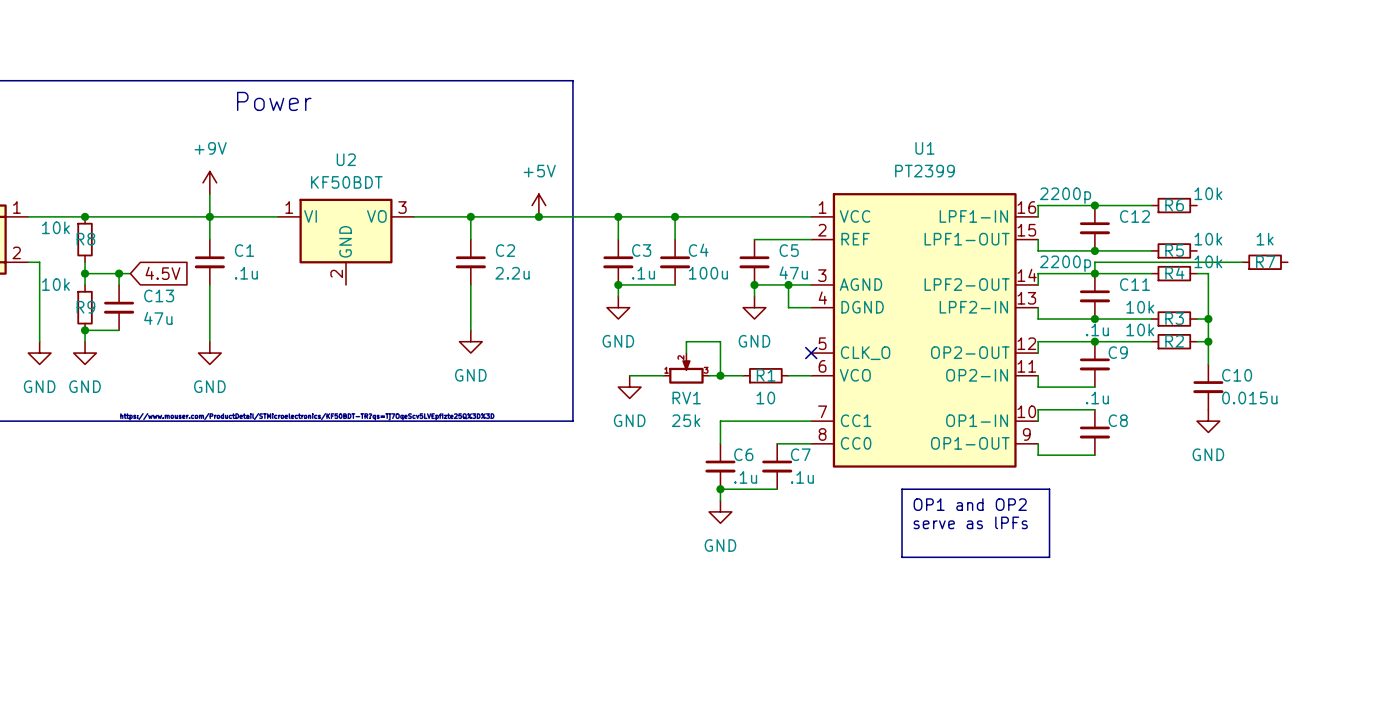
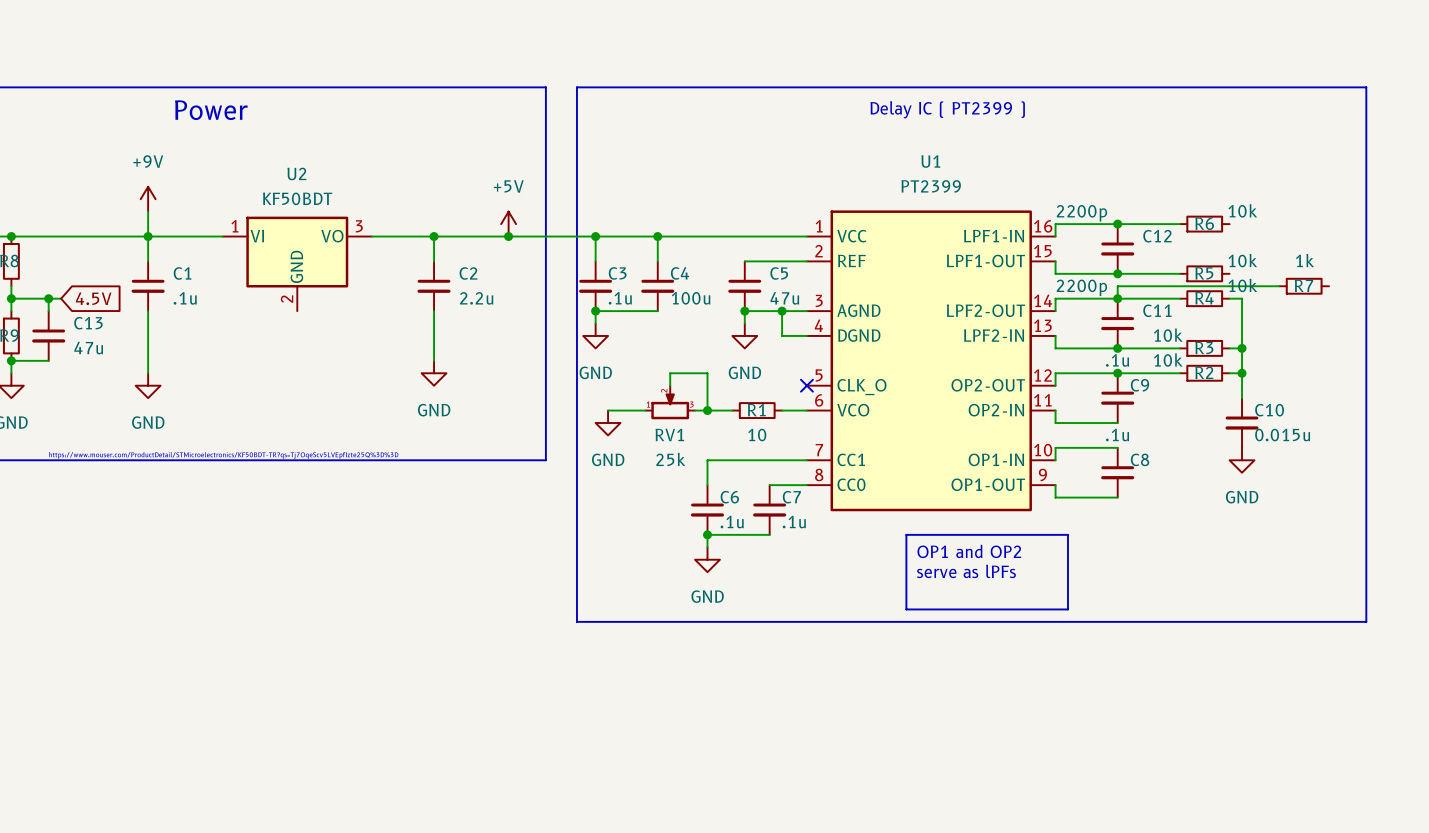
line: none -> (576, 87) (1366, 87) (1366, 621) (576, 621) (576, 87)
text: none -> Delay IC ( PT2399 ) (947, 109)

